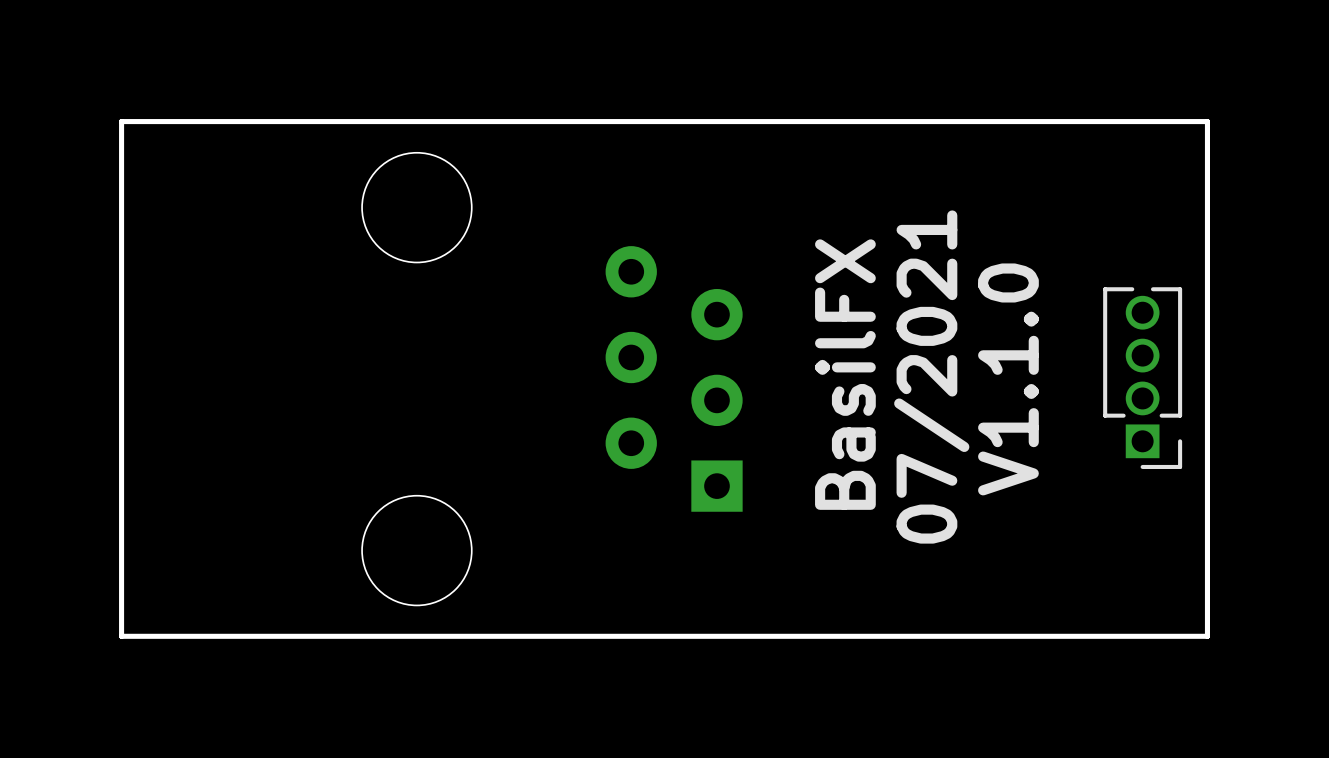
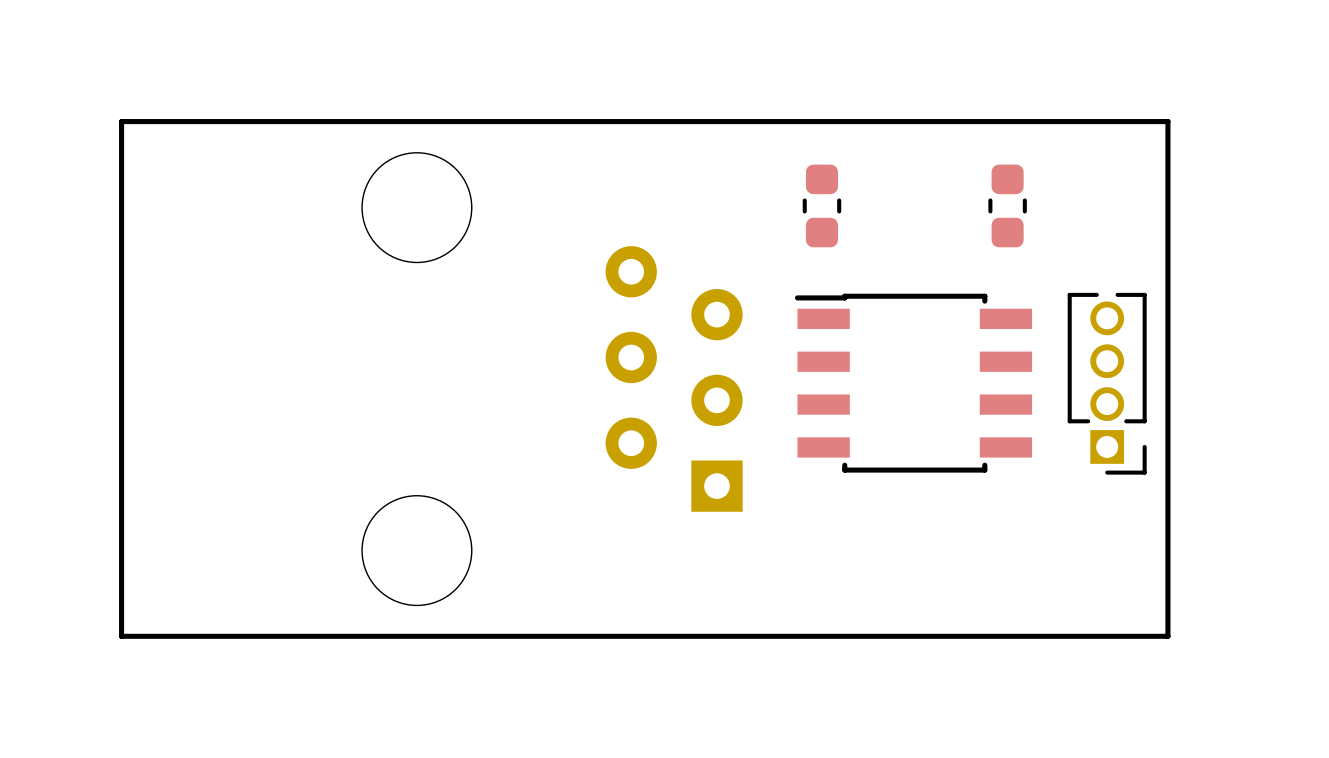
board edge: (1167, 121) (1207, 121) (1207, 636) (1167, 636) -> (1167, 121) (1167, 636)
part: none -> (821, 205)
part: none -> (1007, 205)
text: BasilFX (845, 374) -> none
text: 07/2021 (931, 377) -> none
part position: (1142, 378) -> (1107, 383)
text: V1.1.0 (1008, 379) -> none
part: none -> (913, 383)

